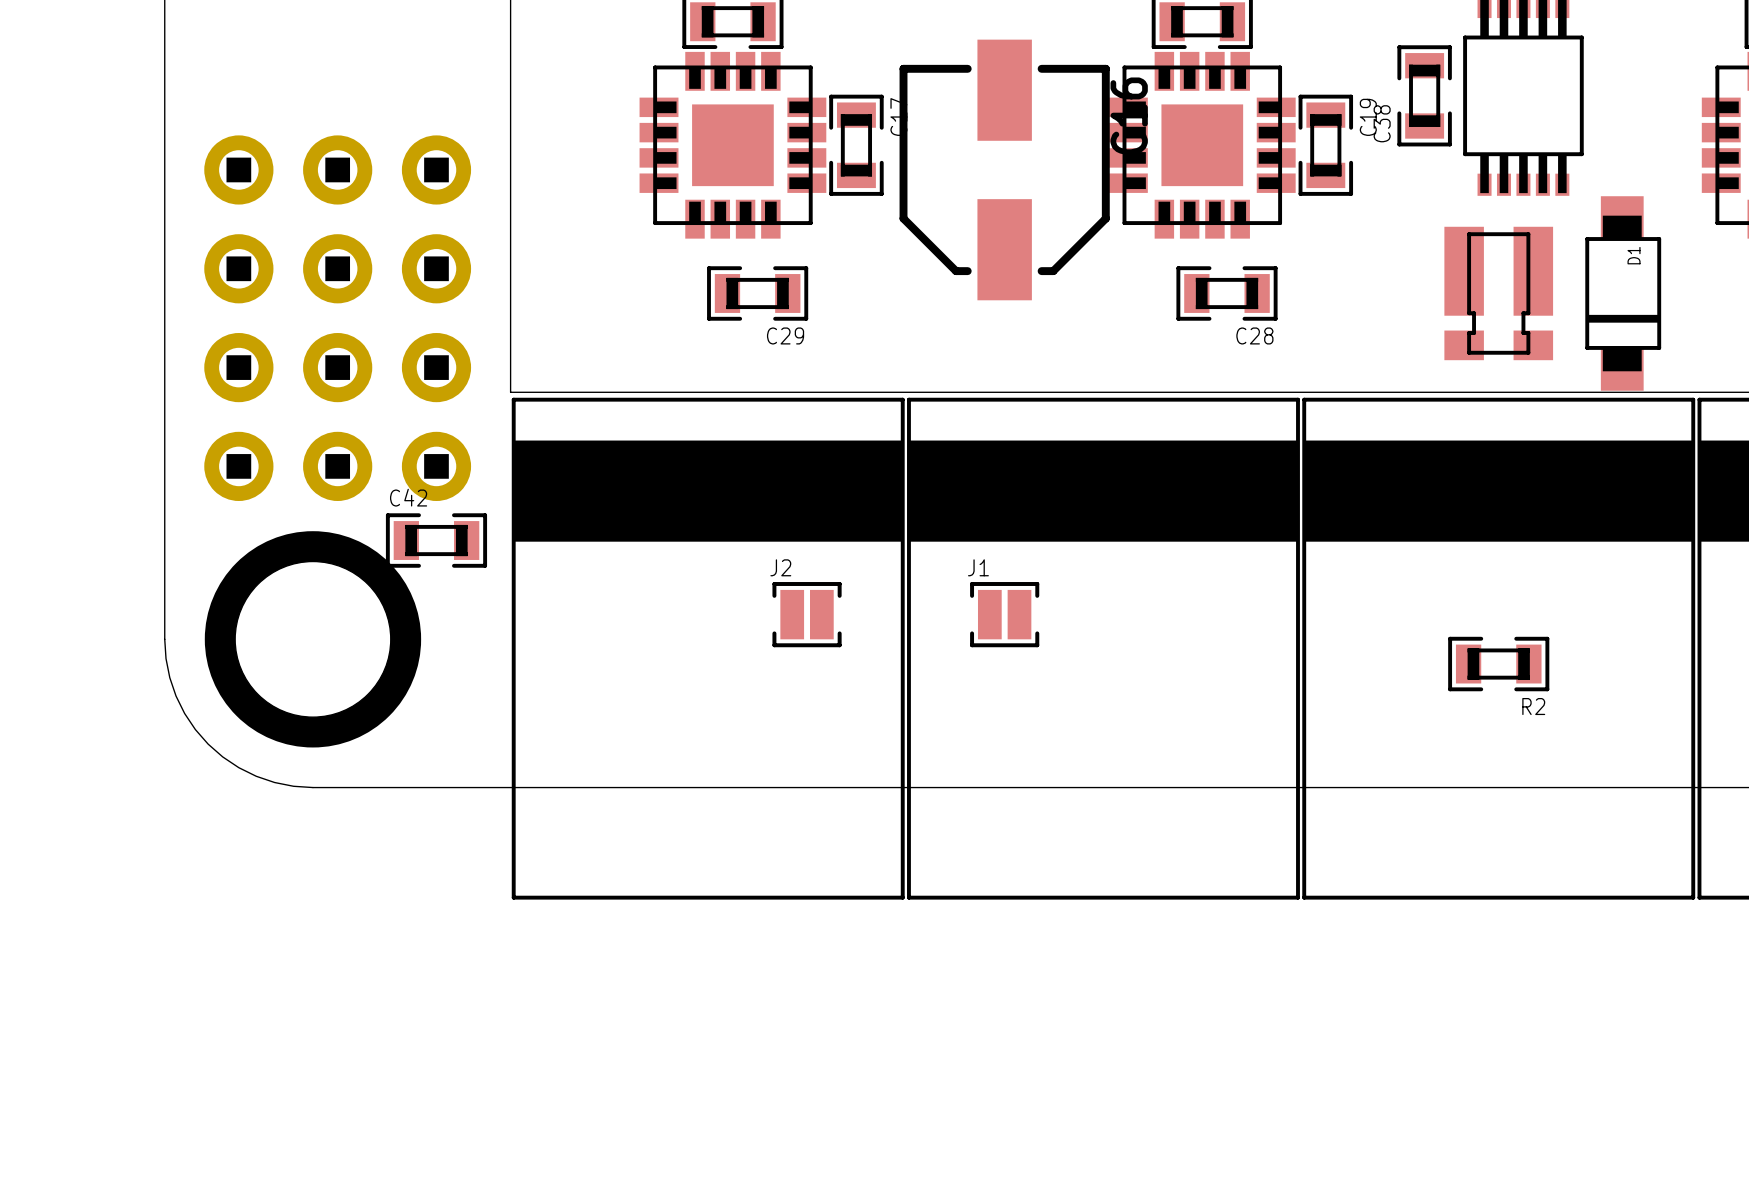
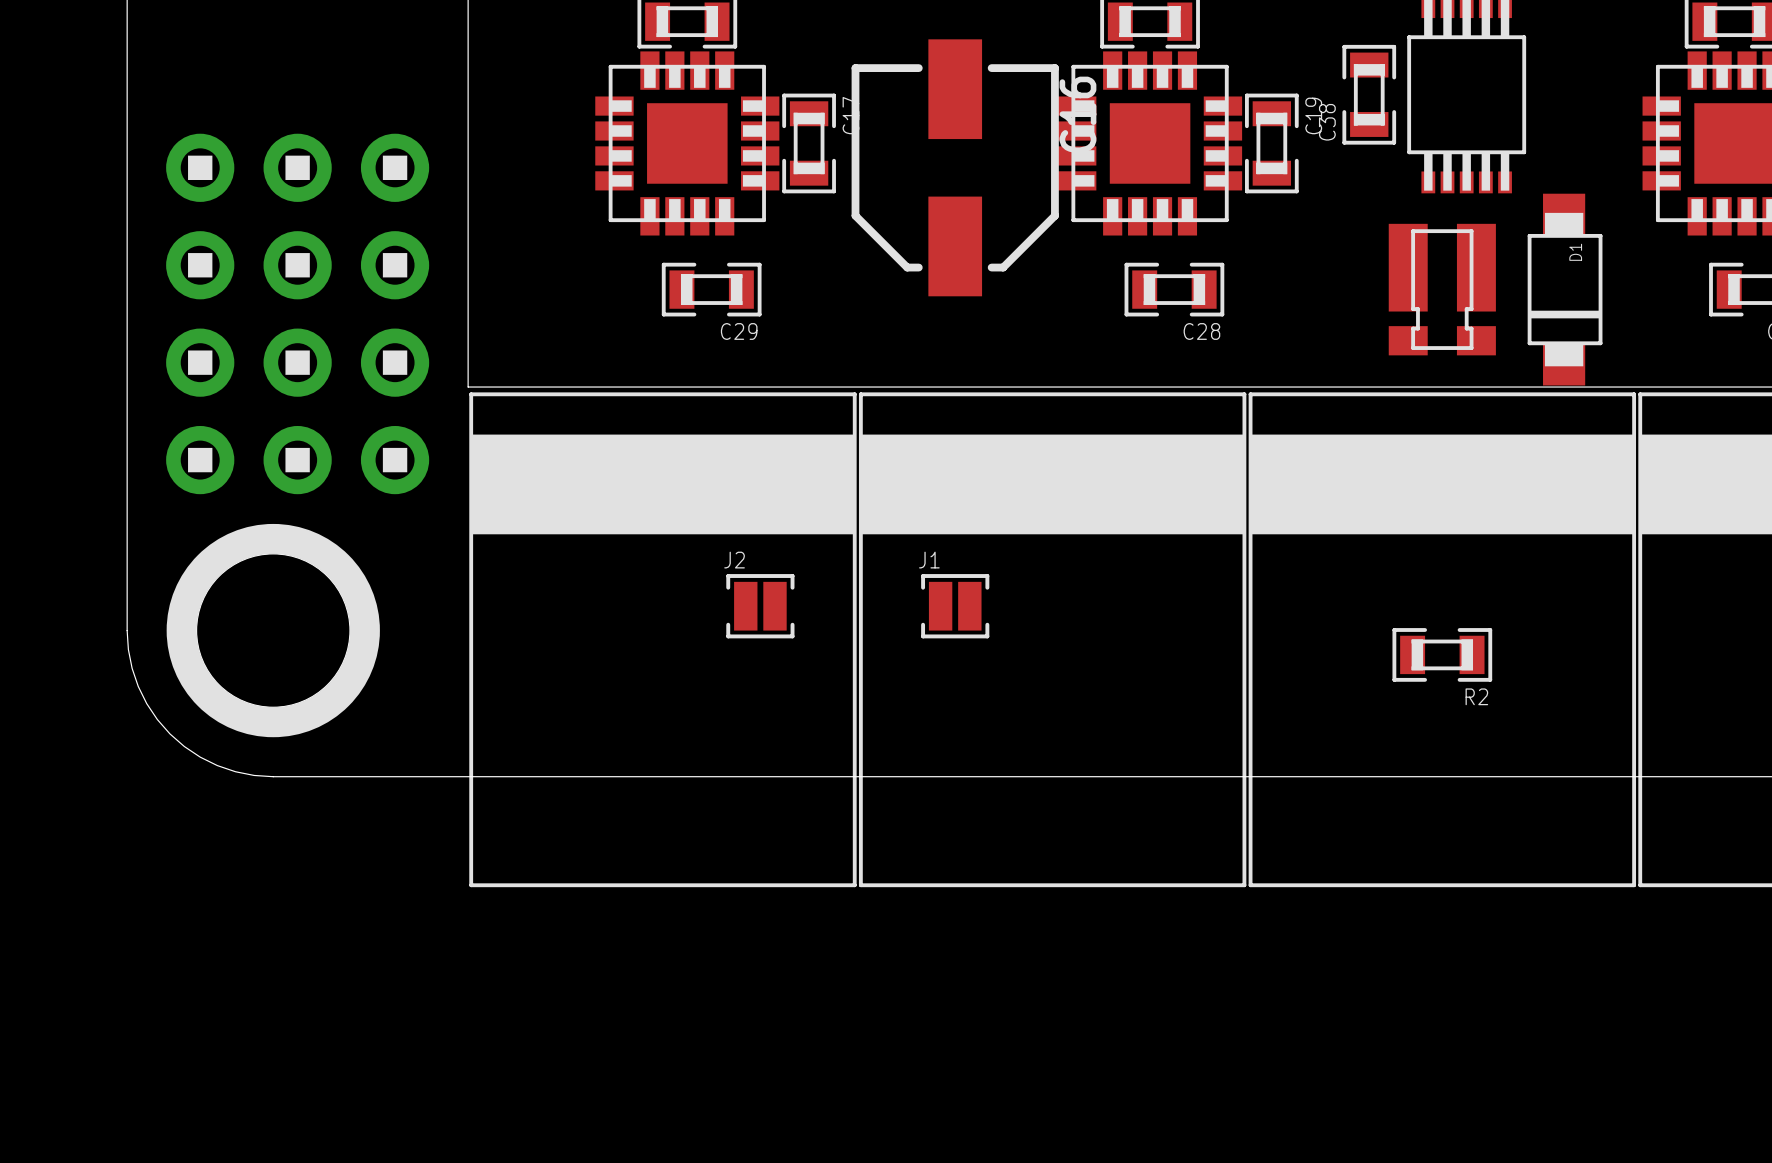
C42: (436, 540) -> none

